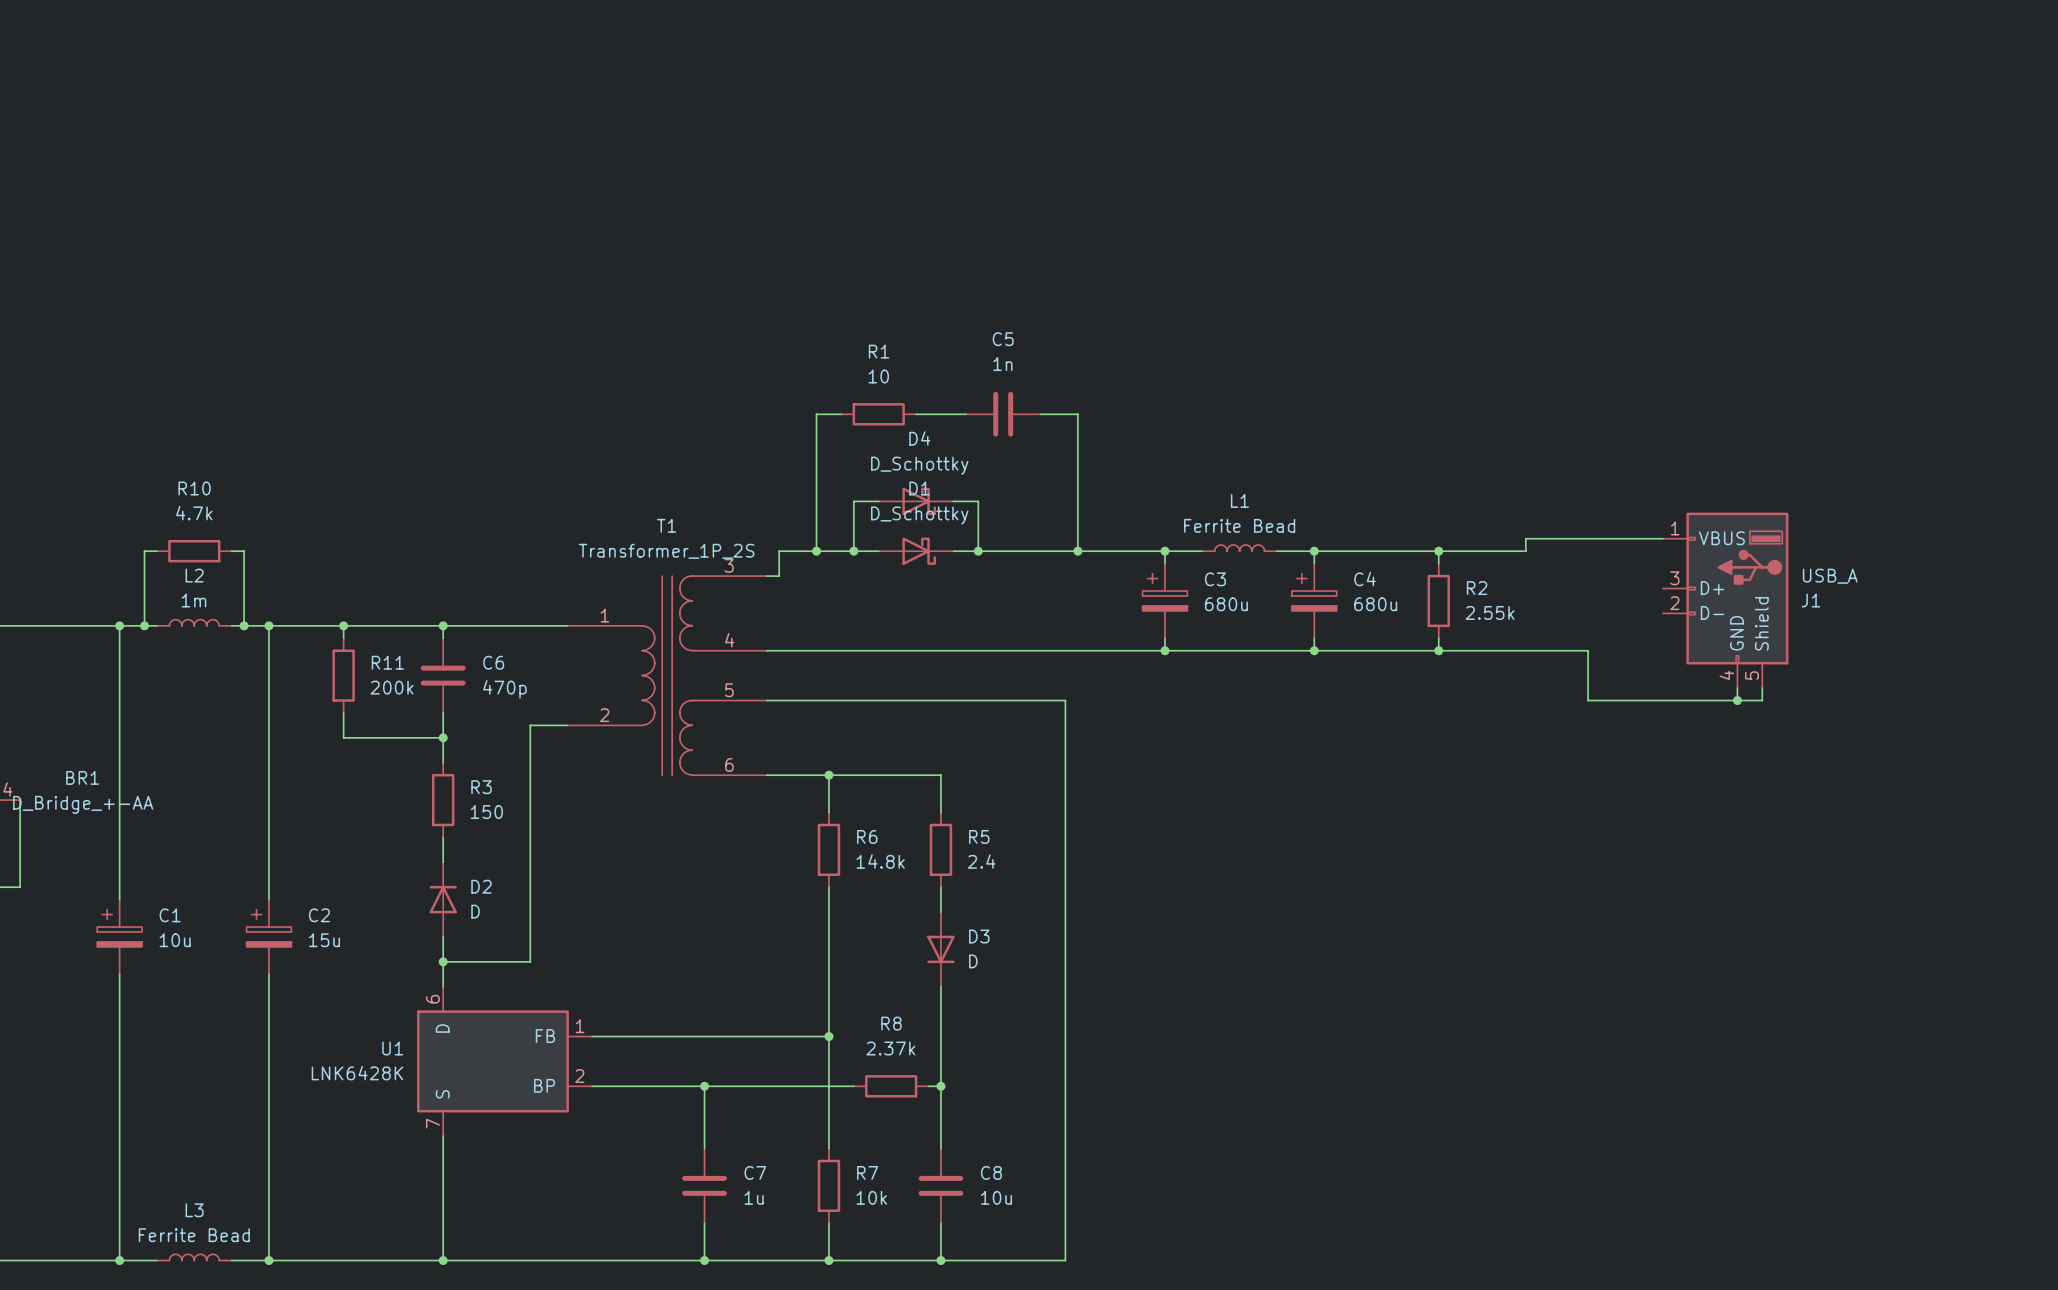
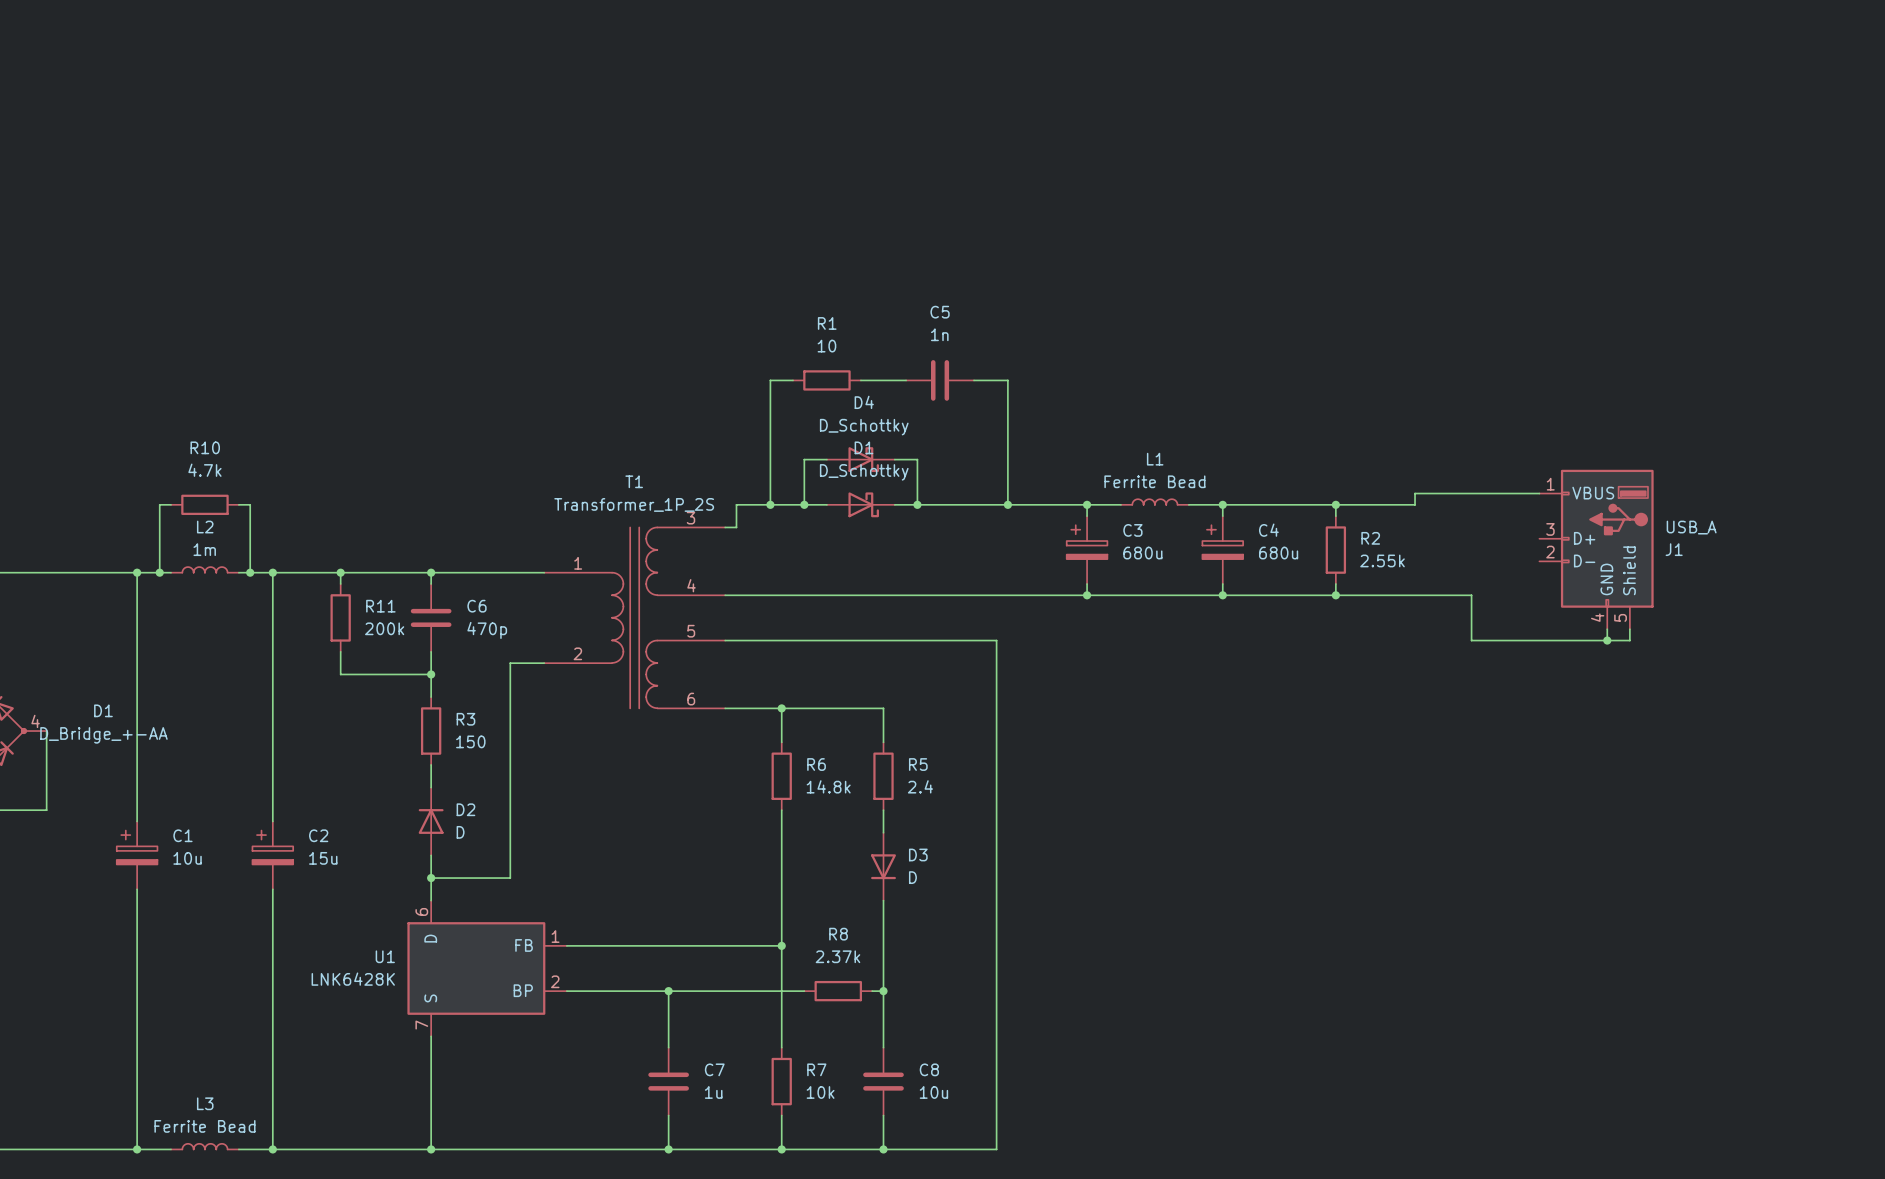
BR1 name: BR1 (82, 777) -> D1 (103, 710)

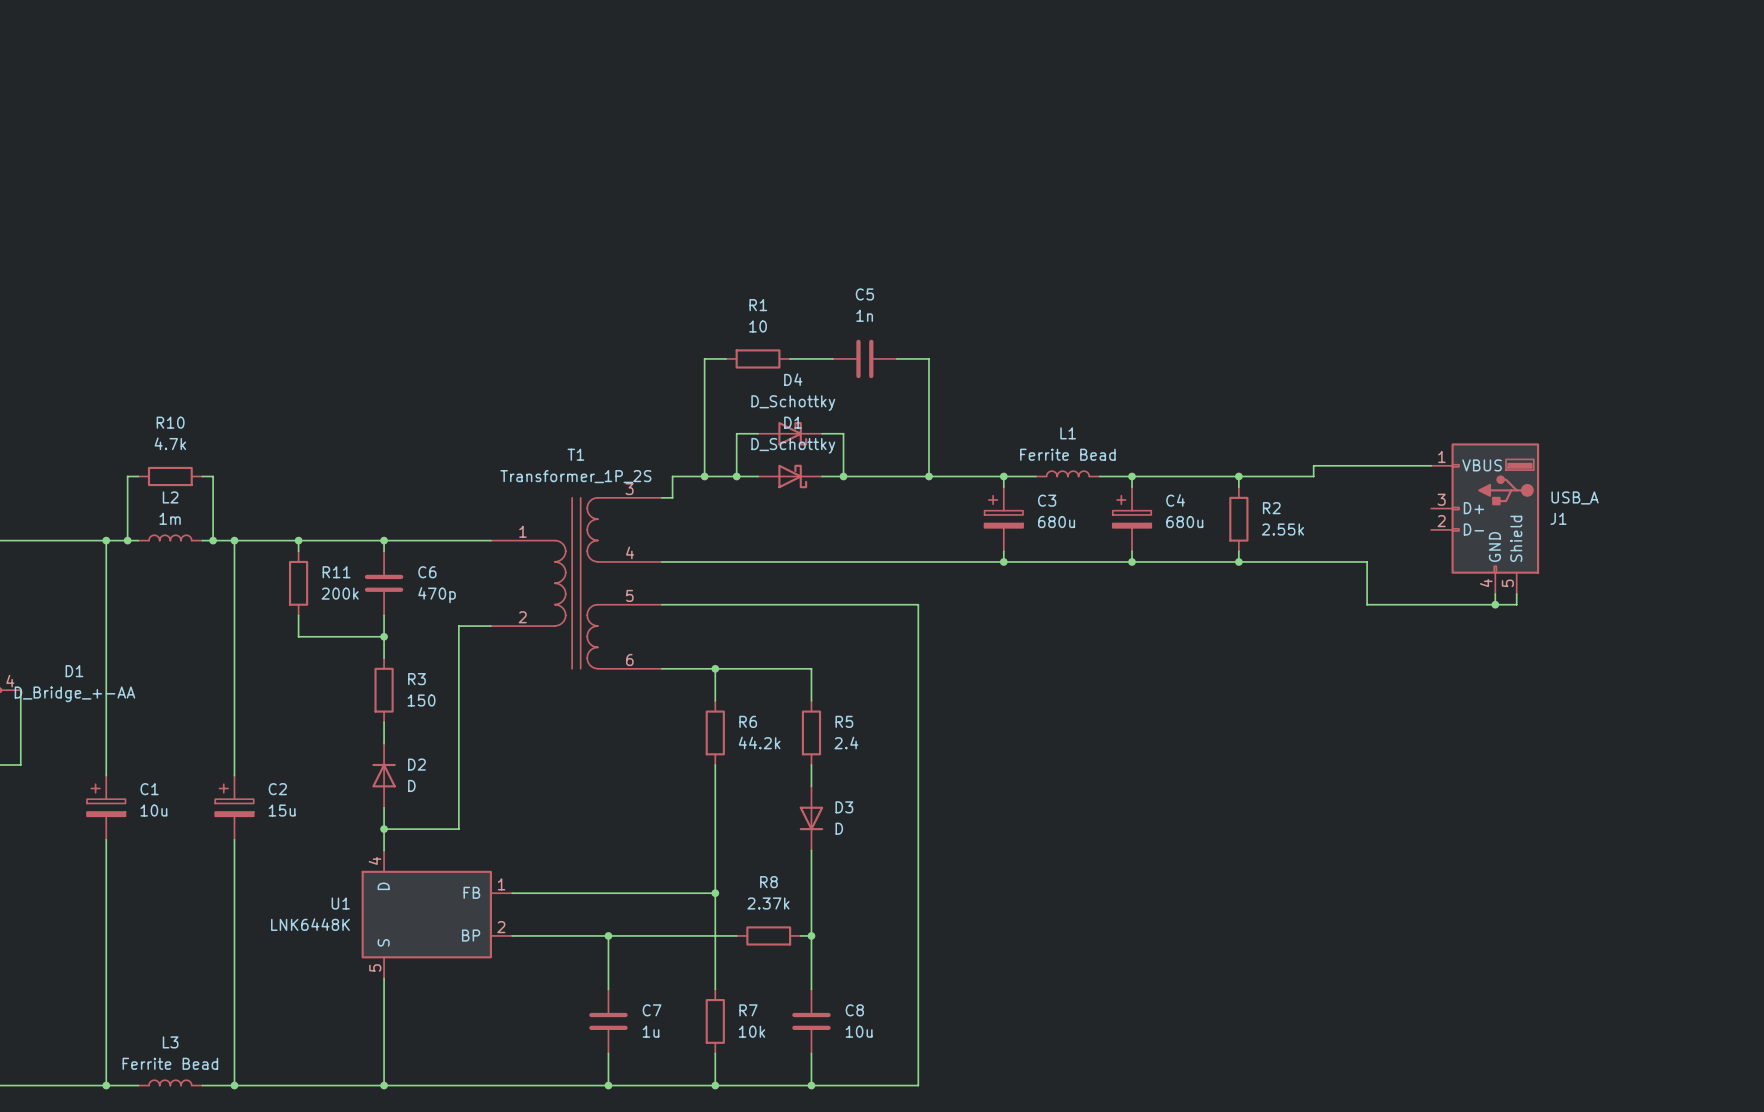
R6 value: 14.8k (828, 786) -> 44.2k (759, 742)
U1 pin number: 6 (421, 911) -> 4 (374, 860)
U1 value: LNK6428K (353, 979) -> LNK6448K (310, 924)
U1 pin number: 7 (421, 1025) -> 5 (375, 968)

